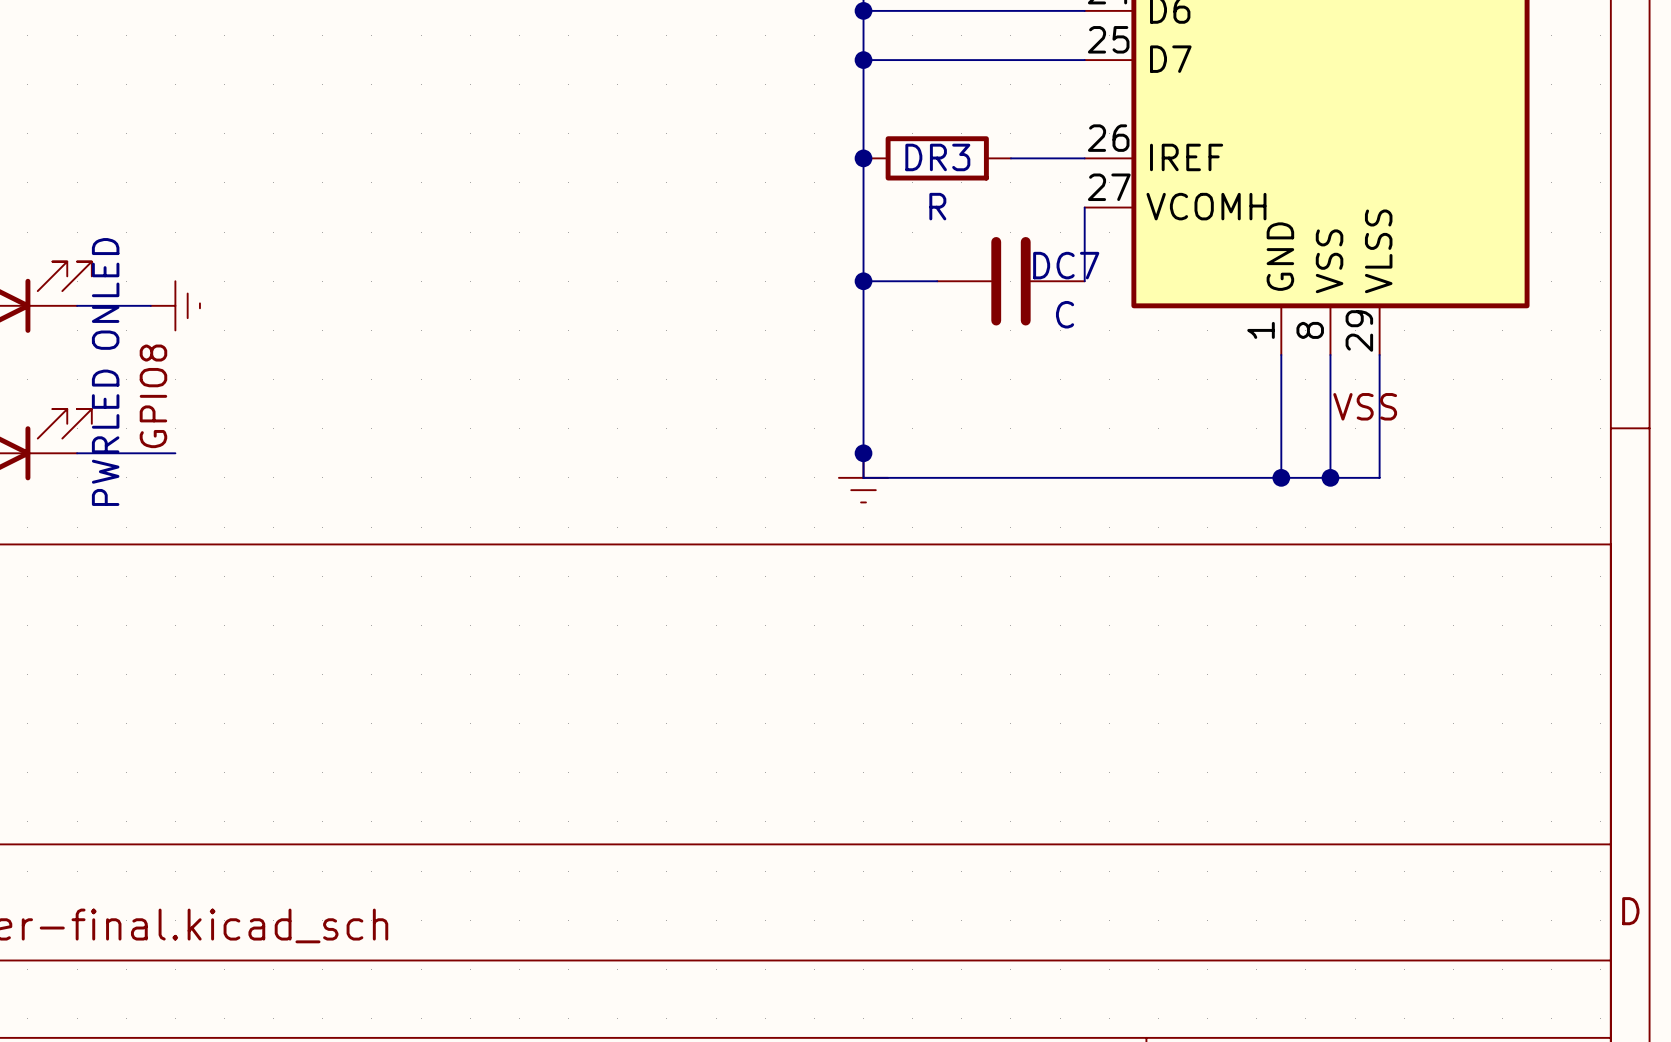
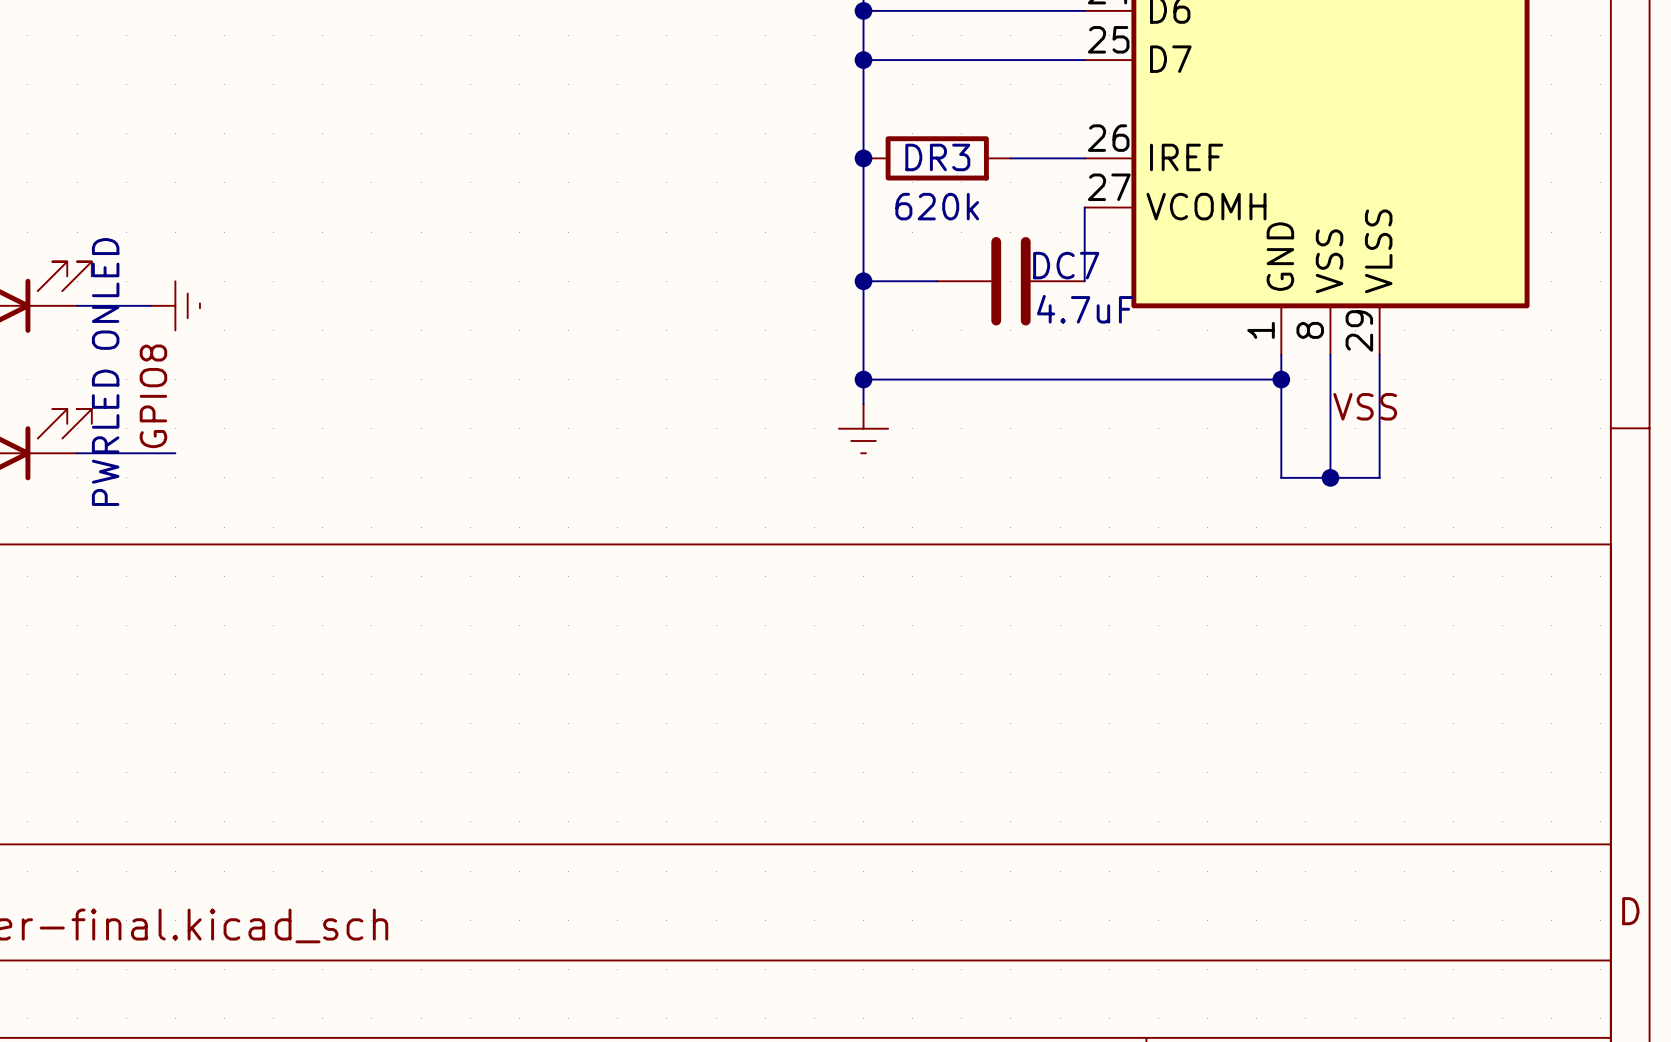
DR3 value: R (937, 206) -> 620k (937, 206)
DC7 value: C (1065, 314) -> 4.7uF (1085, 309)
wire: none -> (863, 379) (1281, 379)
wire: (863, 404) (863, 477) (1281, 477) -> none
junction position: (863, 453) -> (863, 379)
power symbol position: (863, 477) -> (863, 428)
junction position: (1281, 477) -> (1281, 379)

